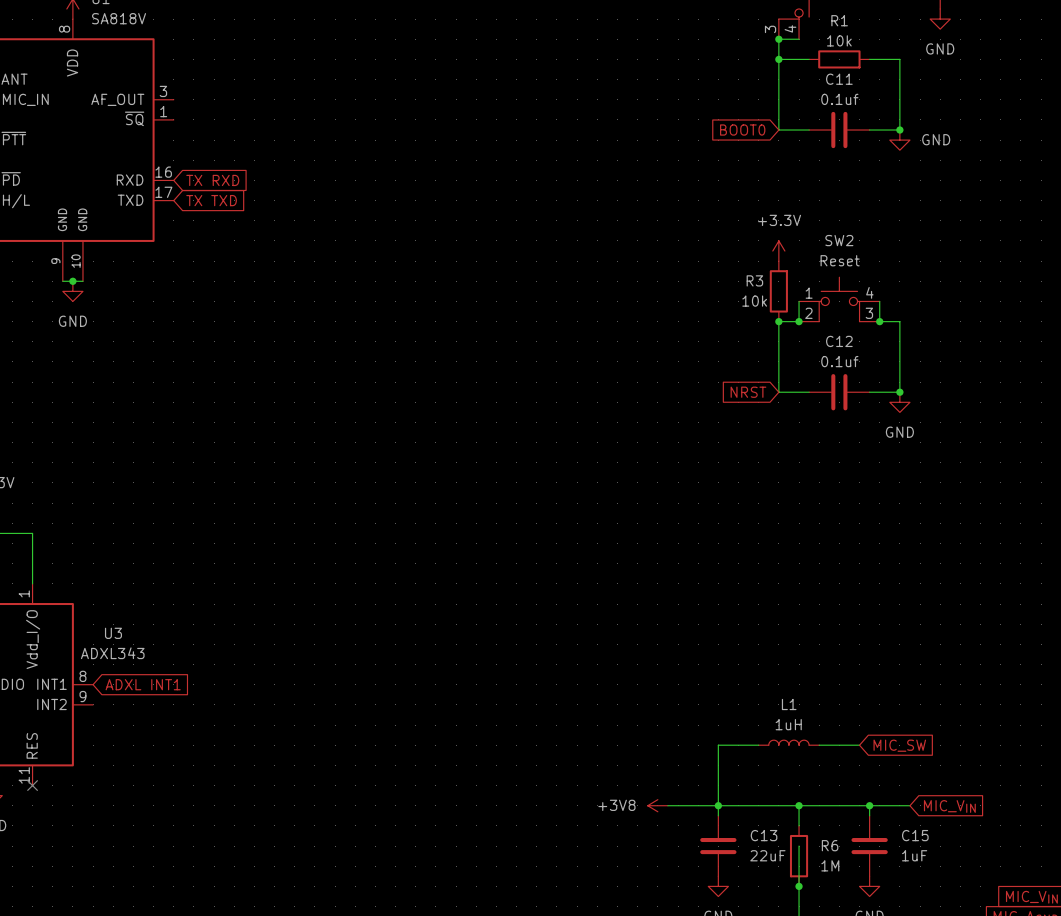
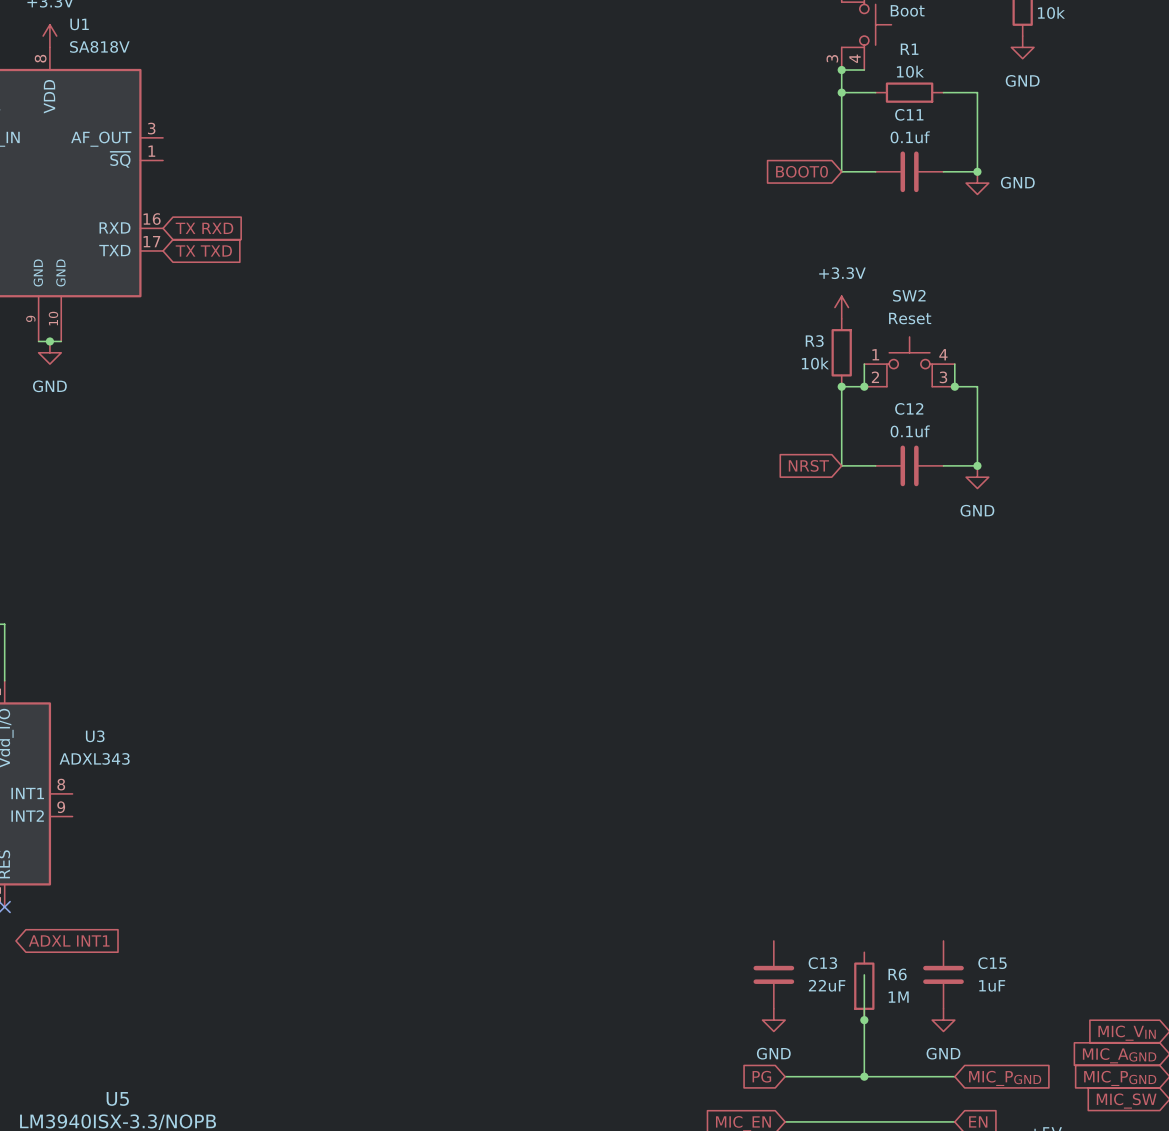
global label position: ADXL INT1 (143, 684) -> ADXL INT1 (69, 940)
L1: 1uH (788, 742) -> none
wire: (758, 745) (718, 745) (718, 815) -> none
wire: (819, 745) (859, 745) -> none
global label: MIC_SW (899, 745) -> none
power symbol: +3V8 (657, 805) -> none
wire: (667, 805) (909, 805) -> none
junction: (718, 805) -> none
wire: (799, 805) (799, 825) -> none
junction: (799, 805) -> none
wire: (869, 805) (869, 815) -> none
junction: (869, 805) -> none
global label: MIC_VIN (949, 806) -> none

